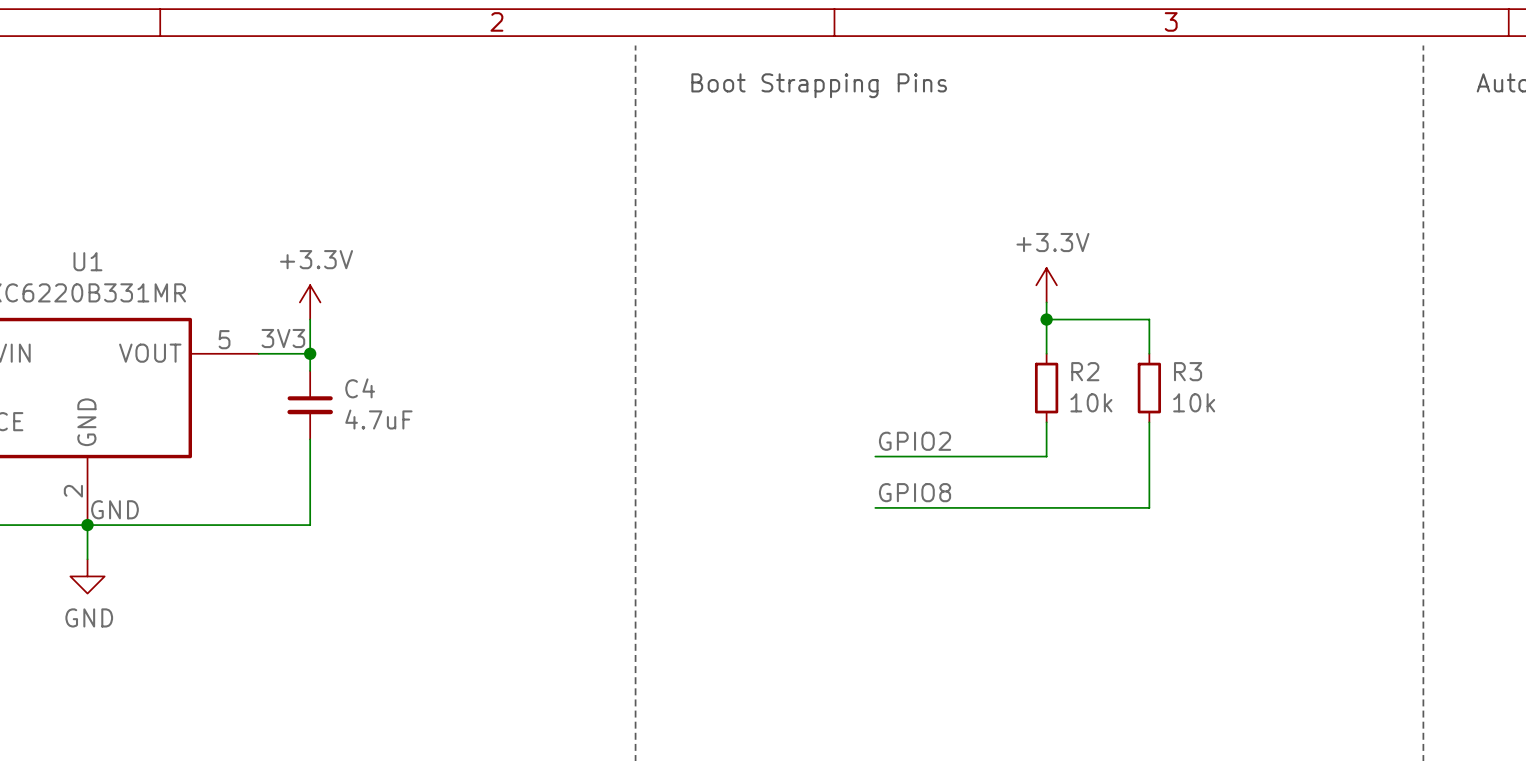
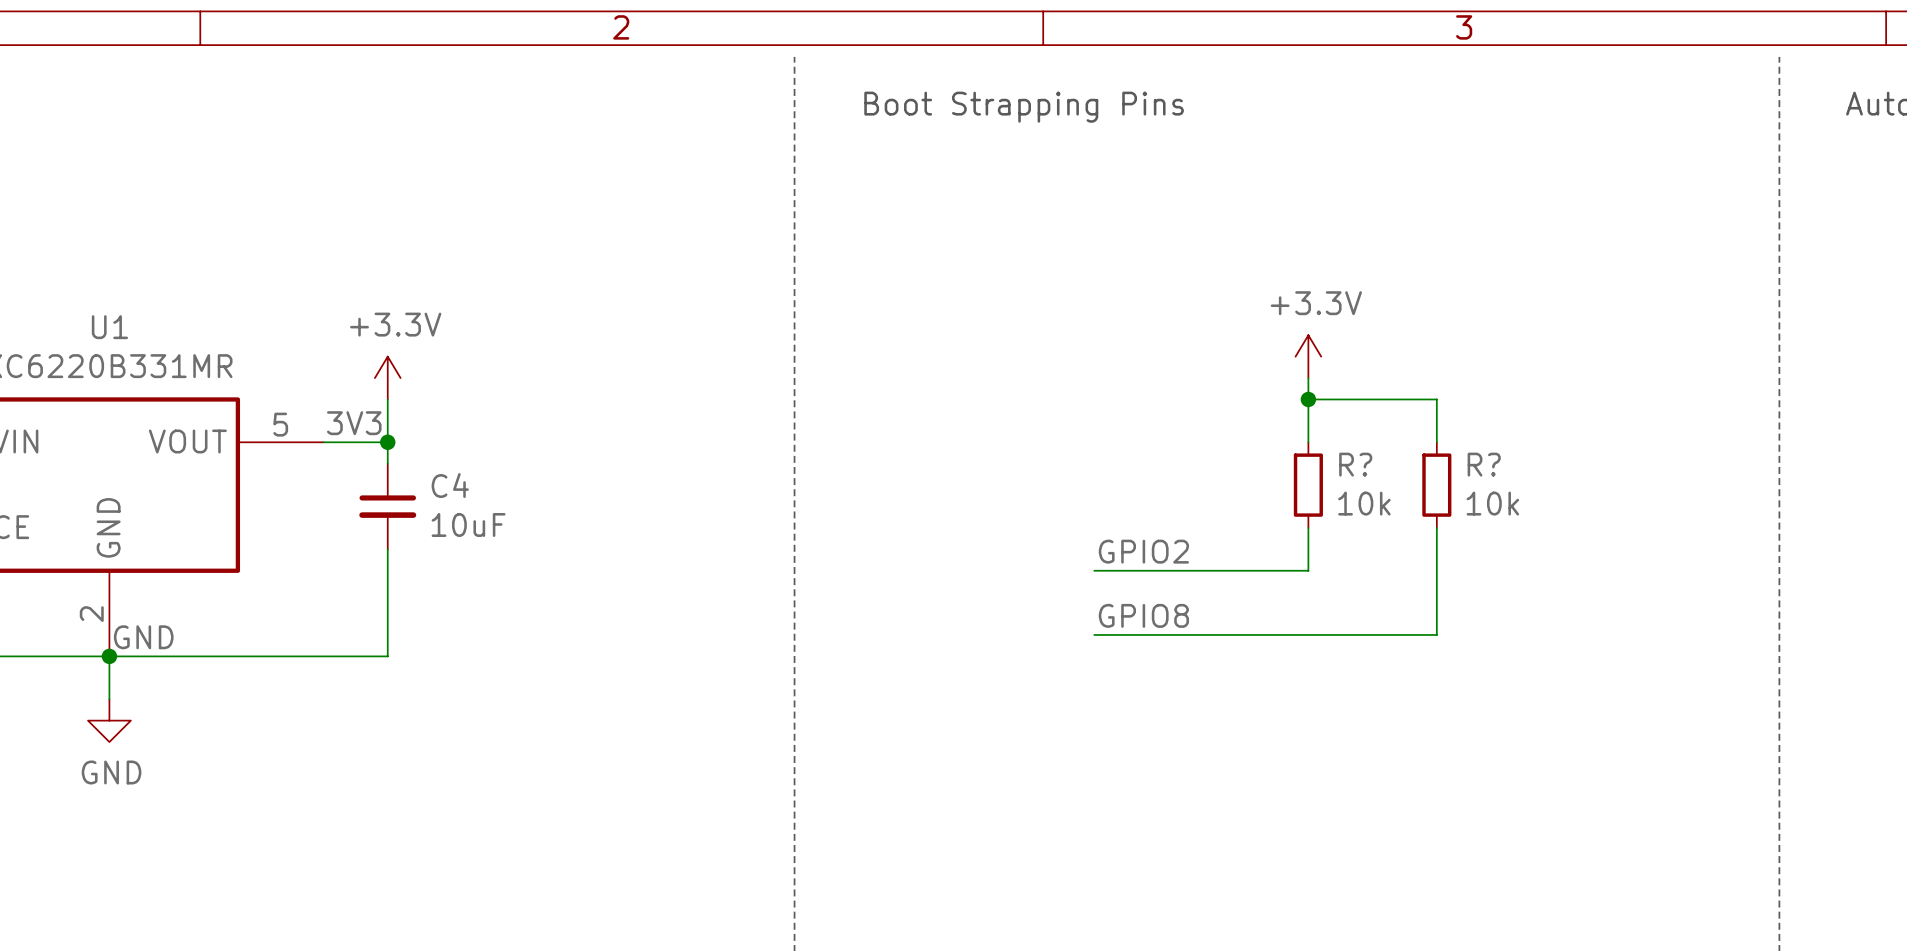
R2 name: R2 (1085, 371) -> R? (1355, 464)
R3 name: R3 (1188, 371) -> R? (1484, 464)
C4 value: 4.7uF (378, 419) -> 10uF (468, 524)

